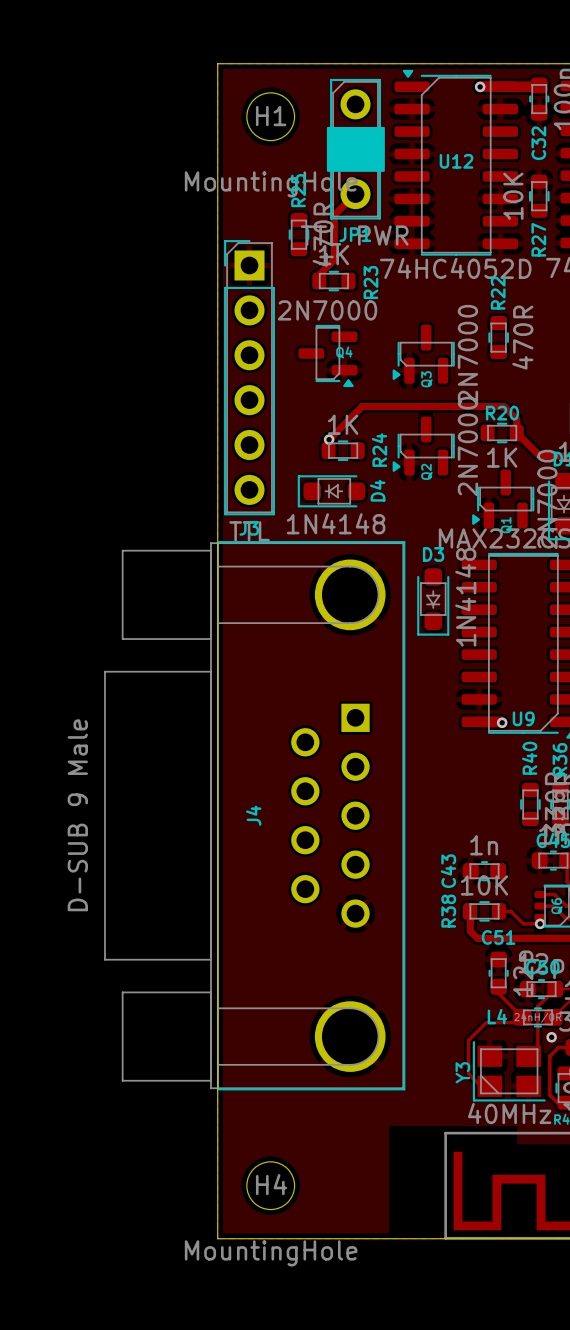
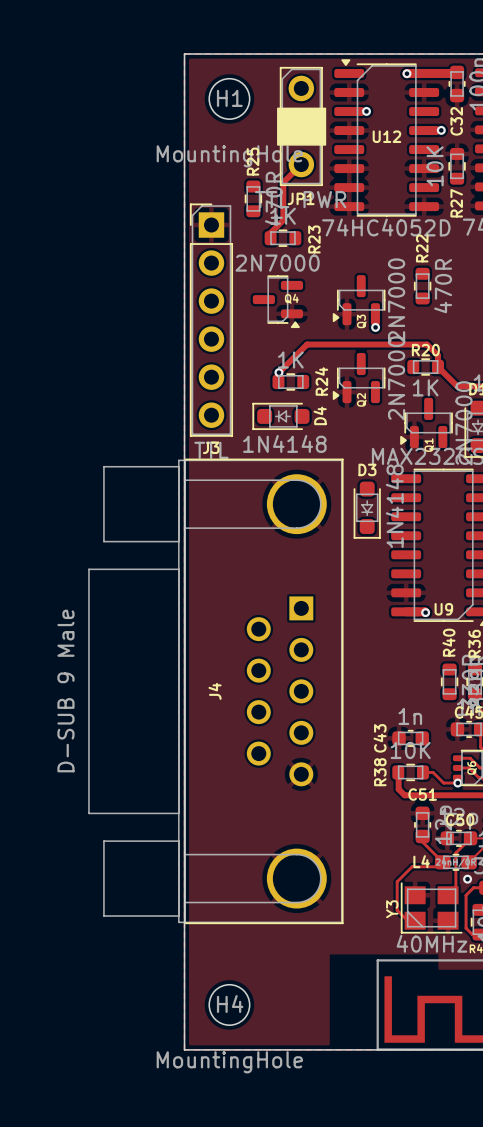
via: none -> (366, 111)
via: none -> (441, 130)
via: none -> (375, 327)

